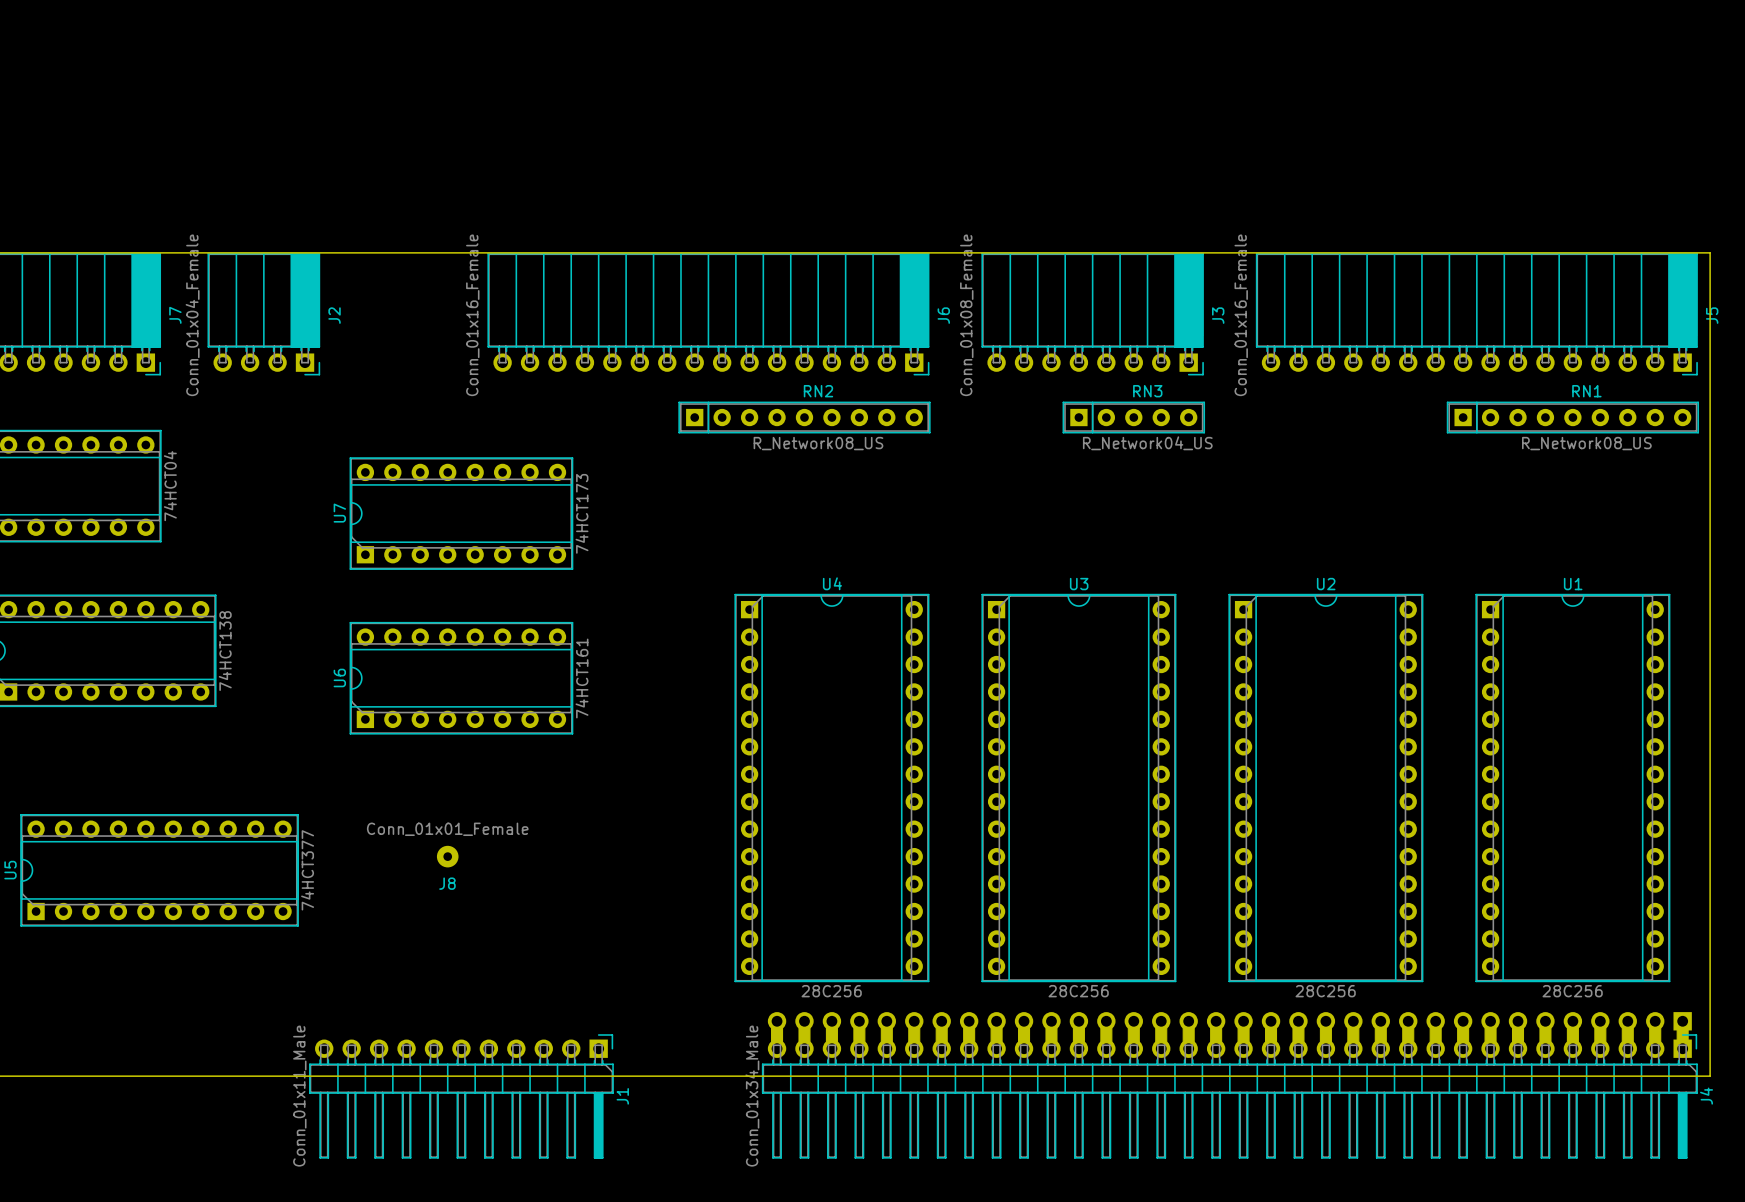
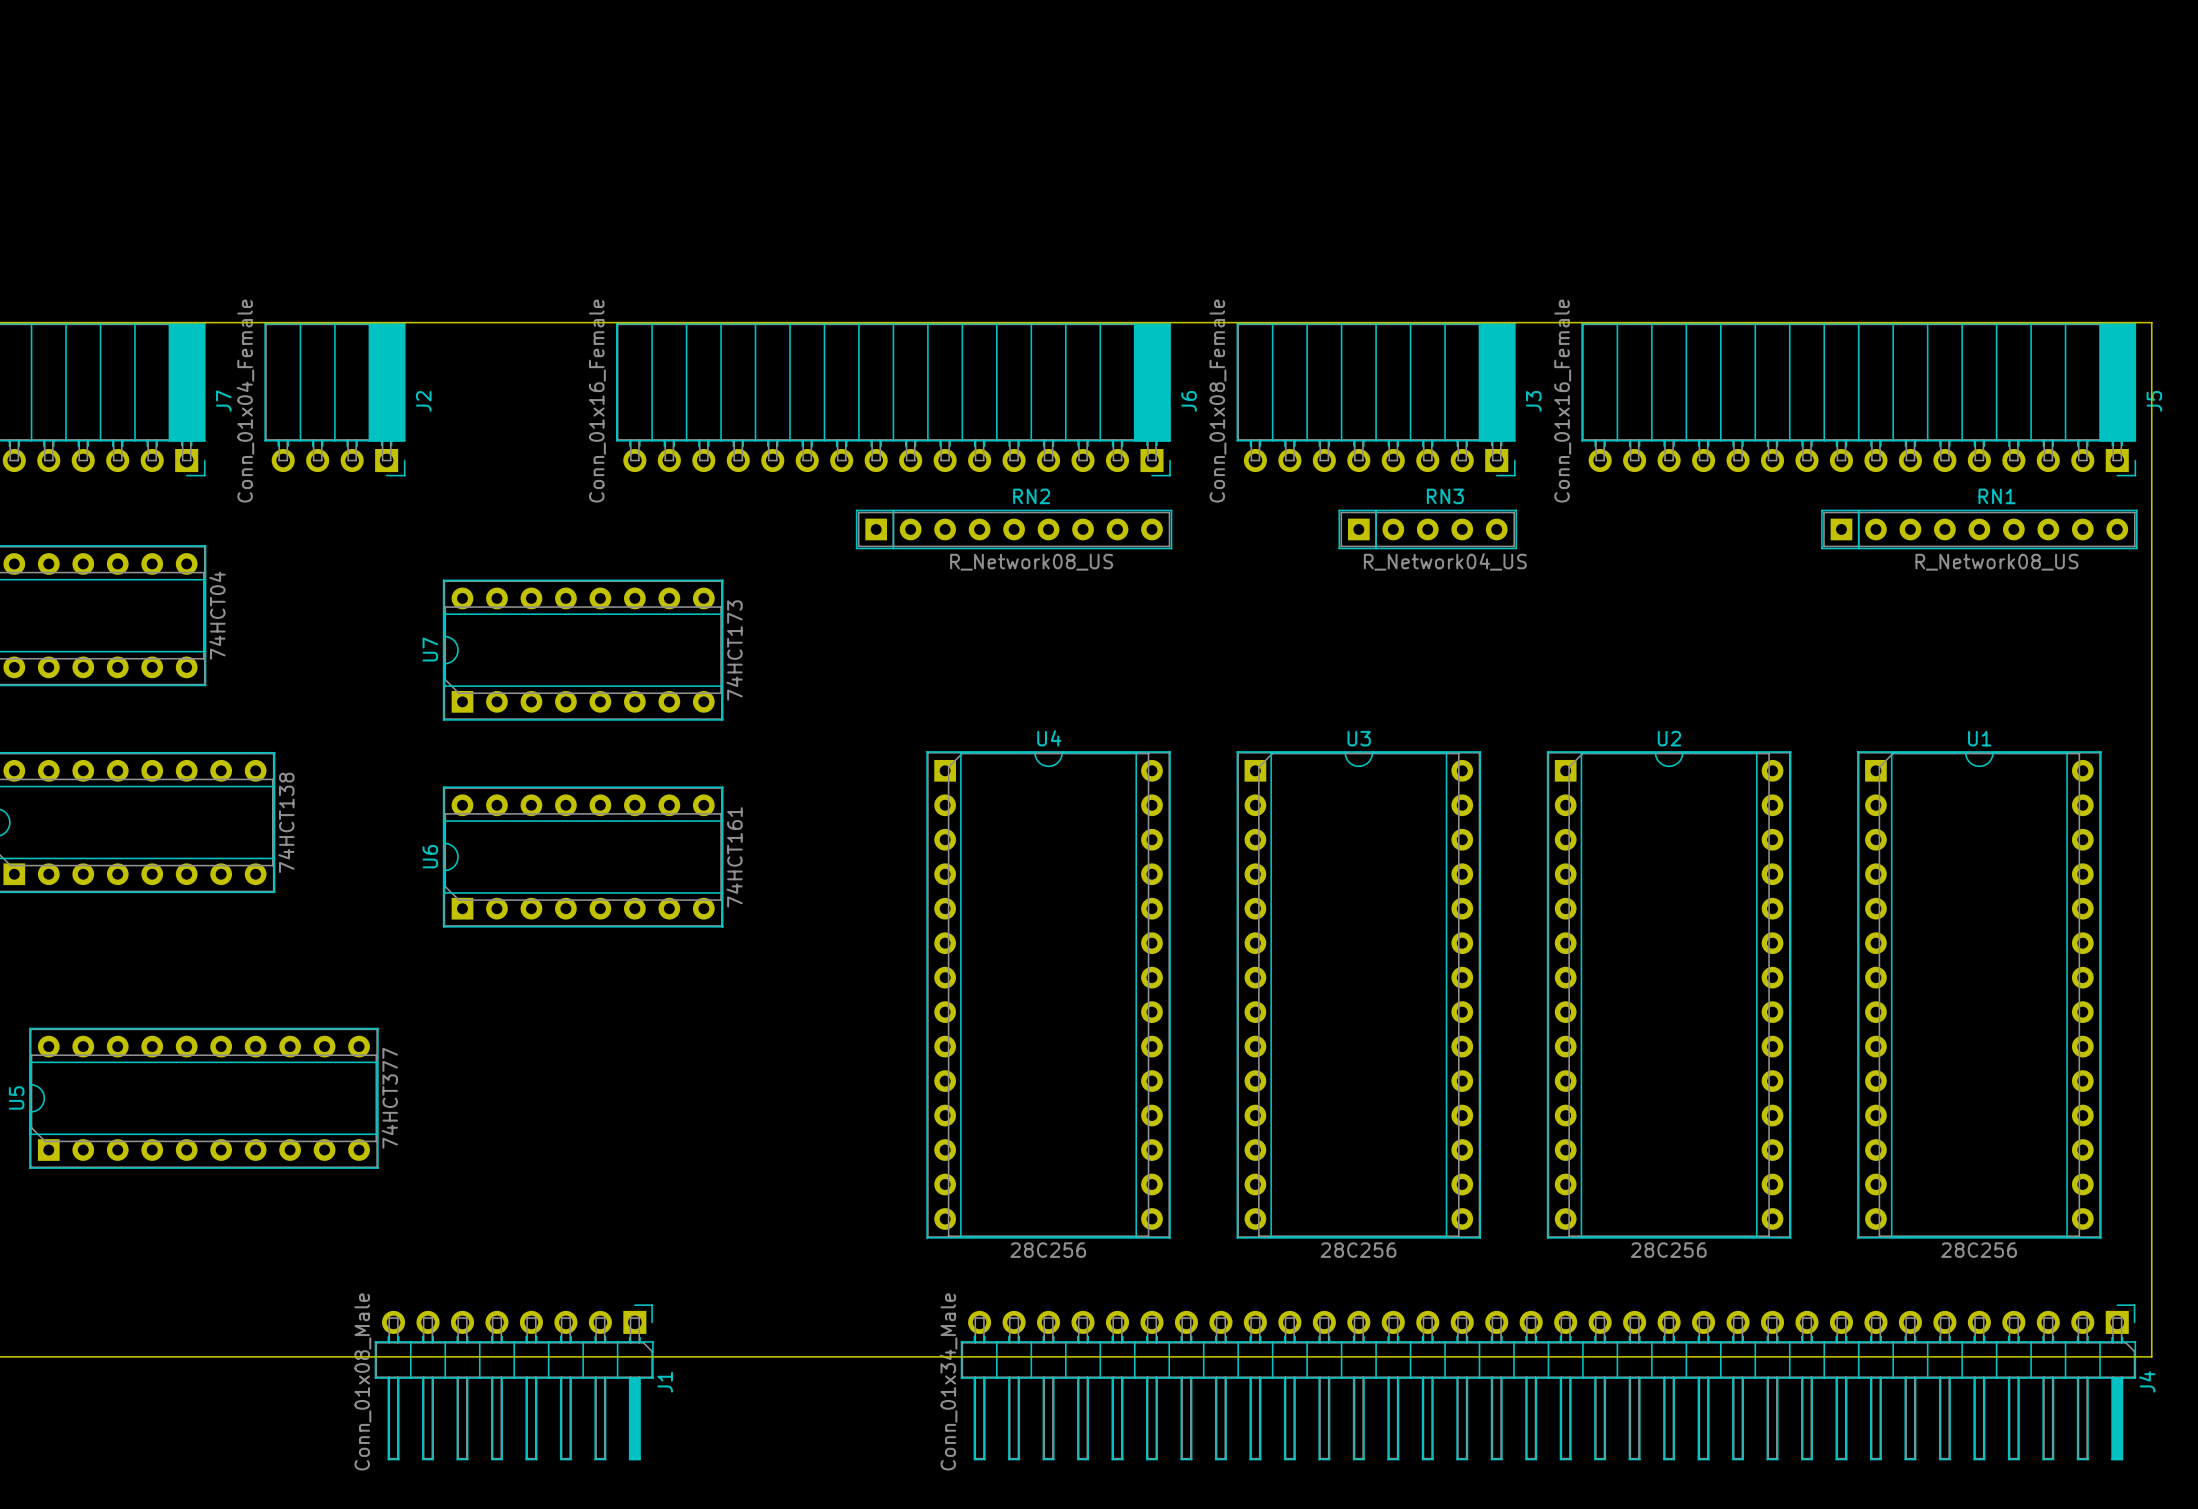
J8: Conn_01x01_Female (447, 856) -> none
J4 footprint: [762, 1012, 1698, 1159] -> [960, 1304, 2137, 1461]
J1 footprint: [309, 1034, 614, 1159] -> [374, 1304, 654, 1461]
J1 value: Conn_01x11_Male (299, 1096) -> Conn_01x08_Male (362, 1381)
J1 name position: J1 (622, 1096) -> J1 (665, 1382)

